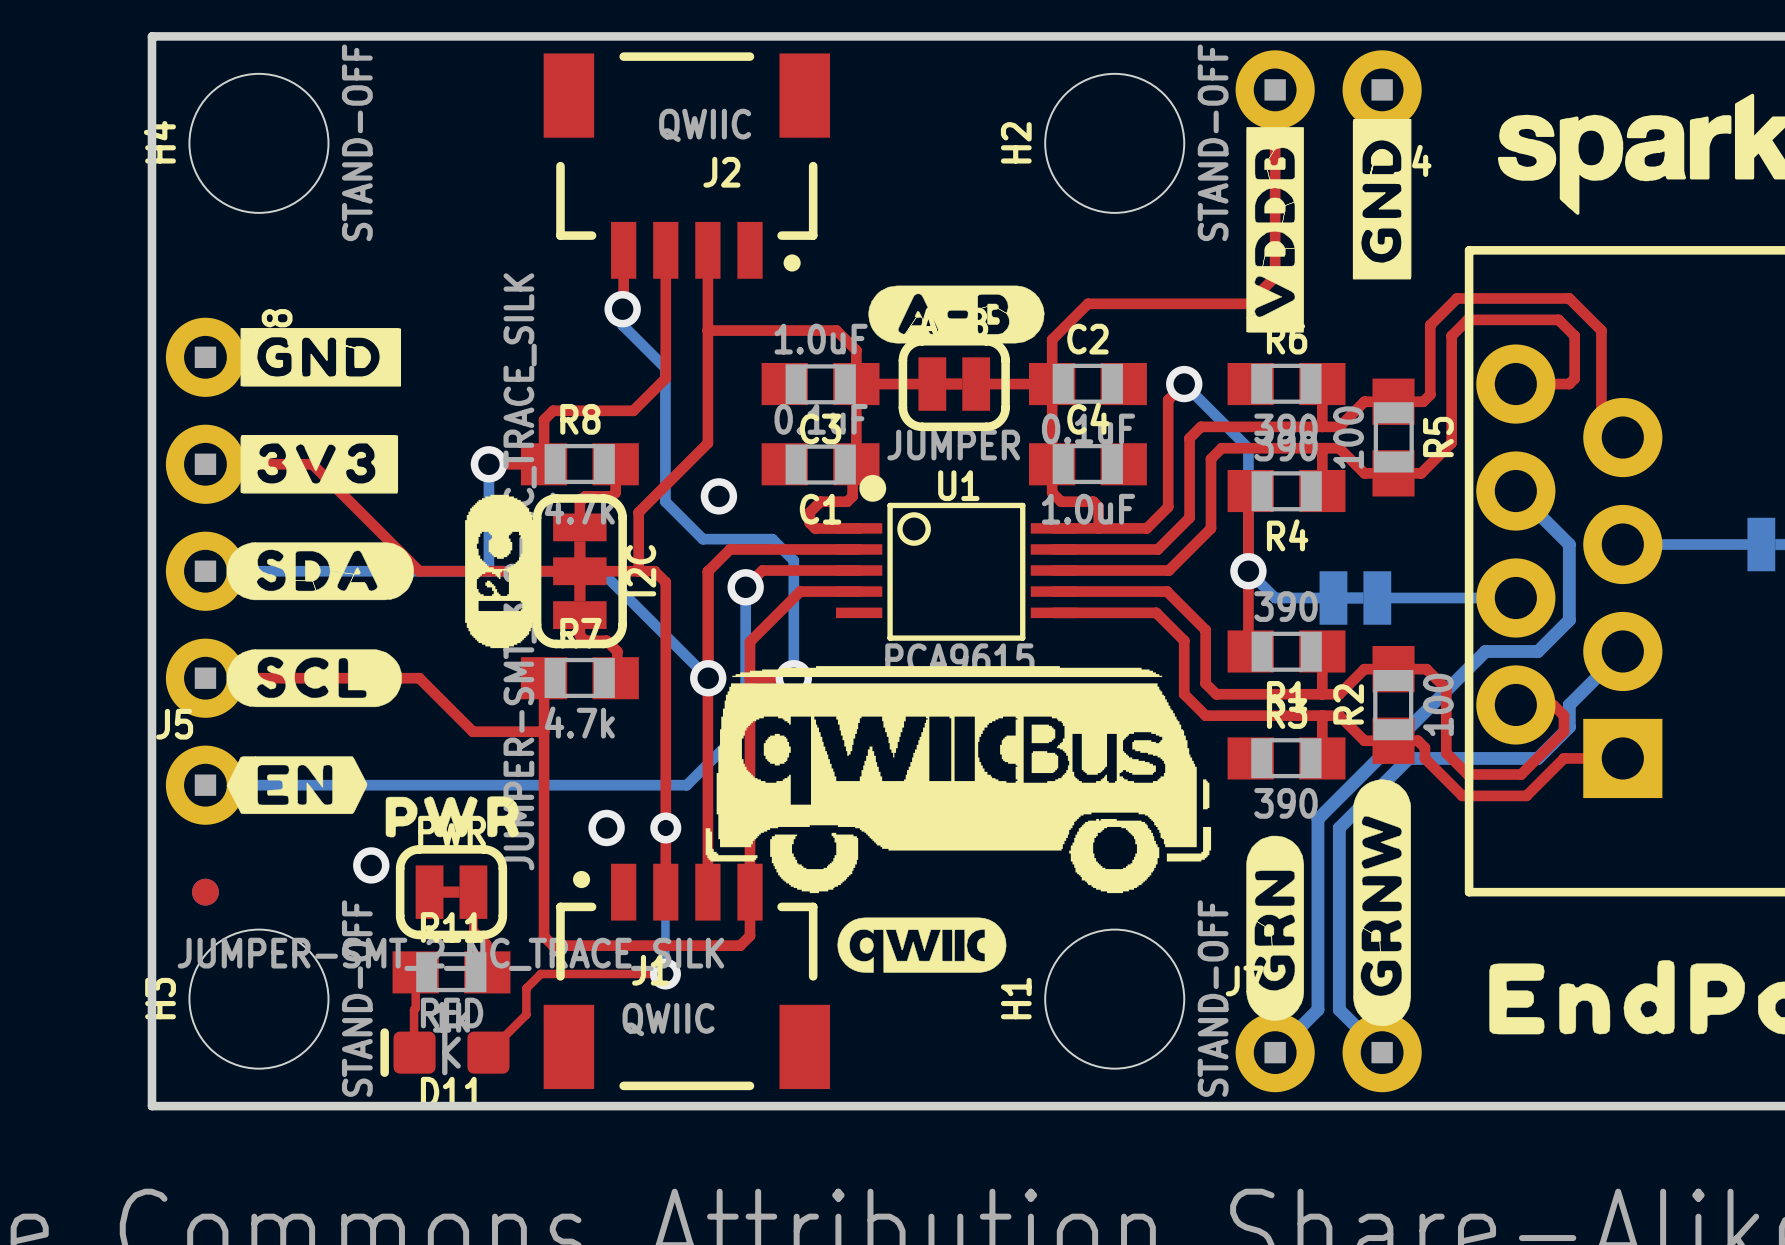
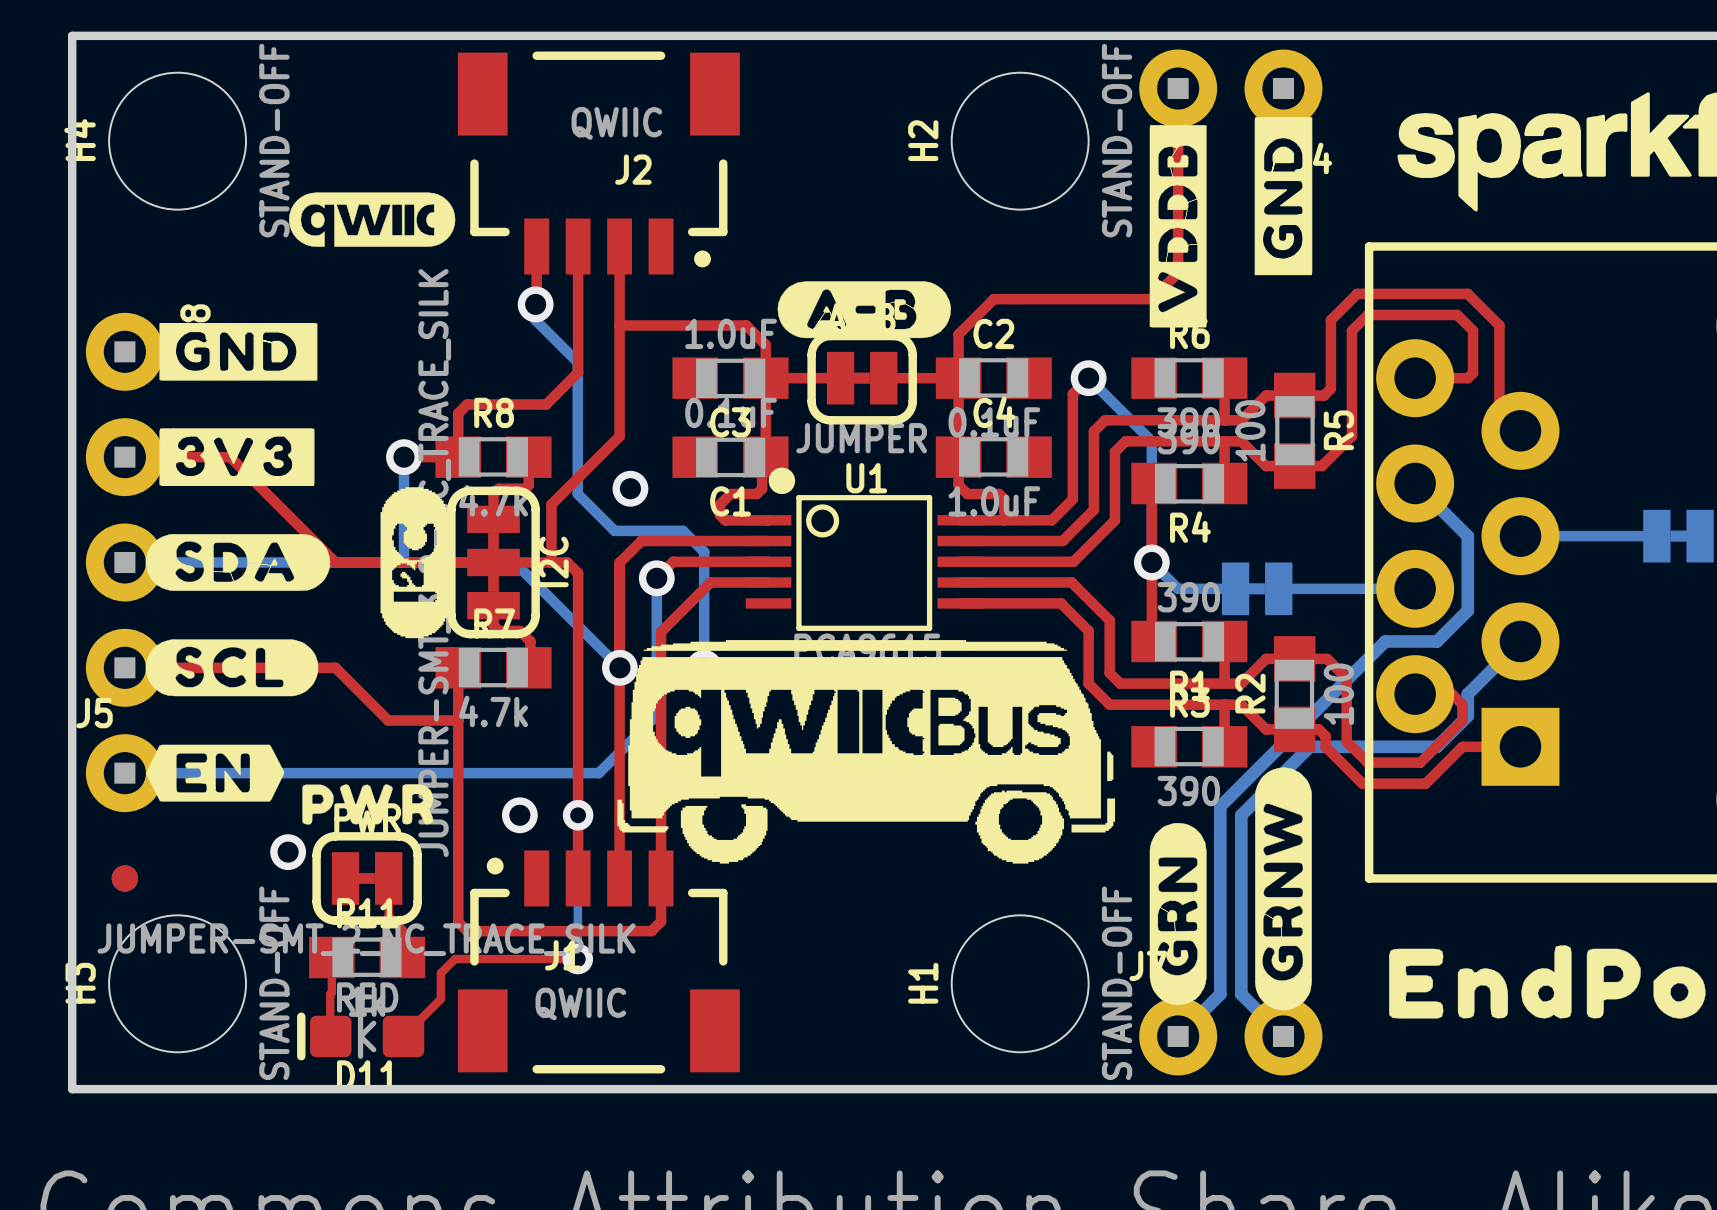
drawing position: (958, 779) -> (866, 751)
drawing position: (921, 945) -> (372, 219)

